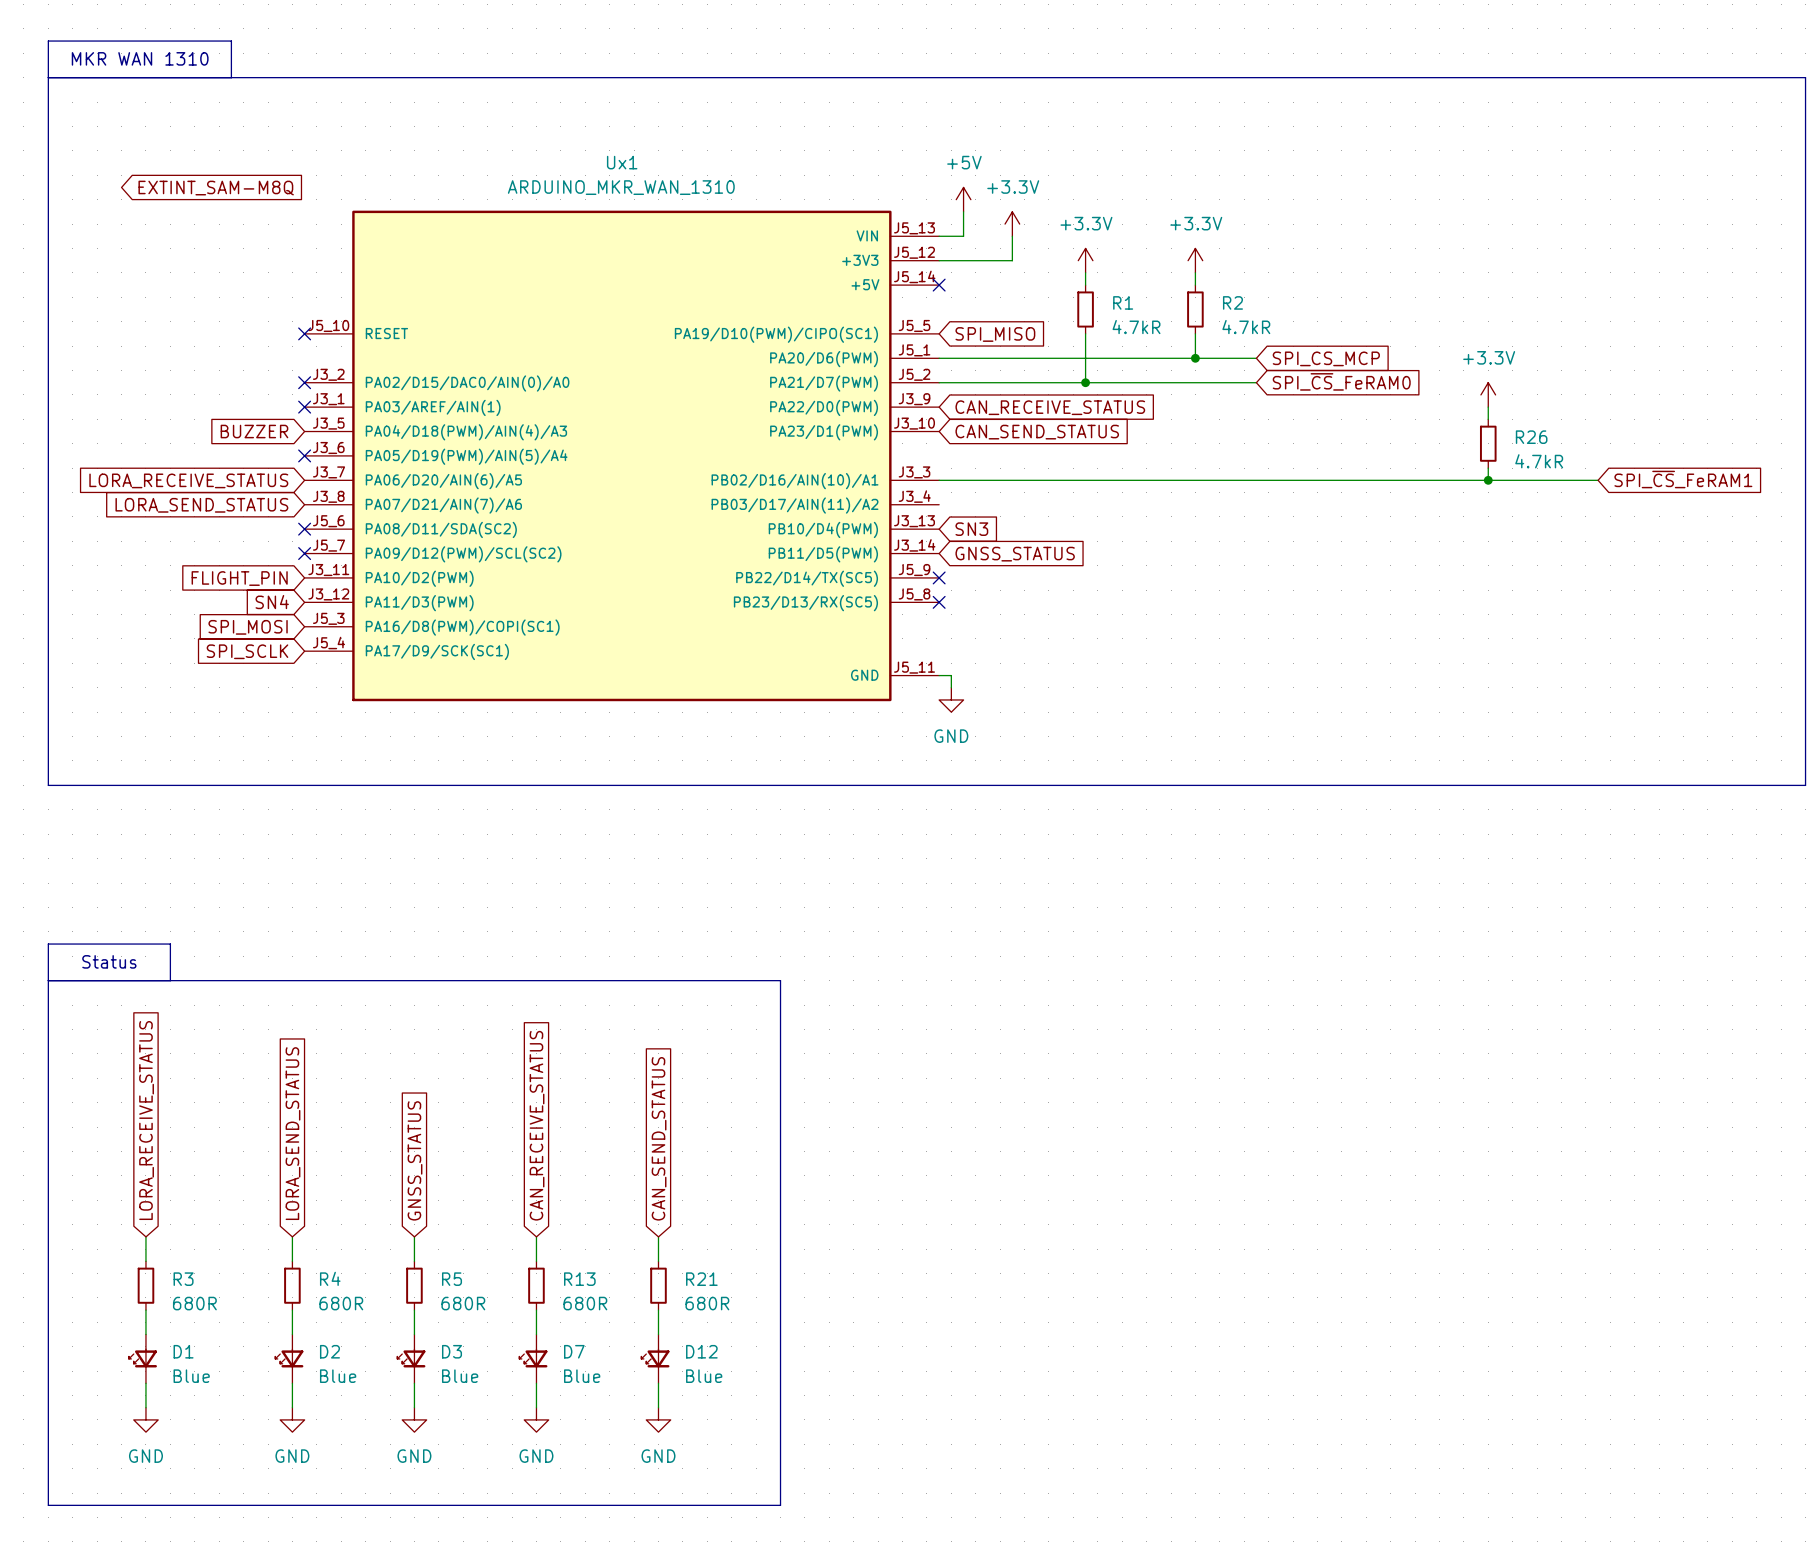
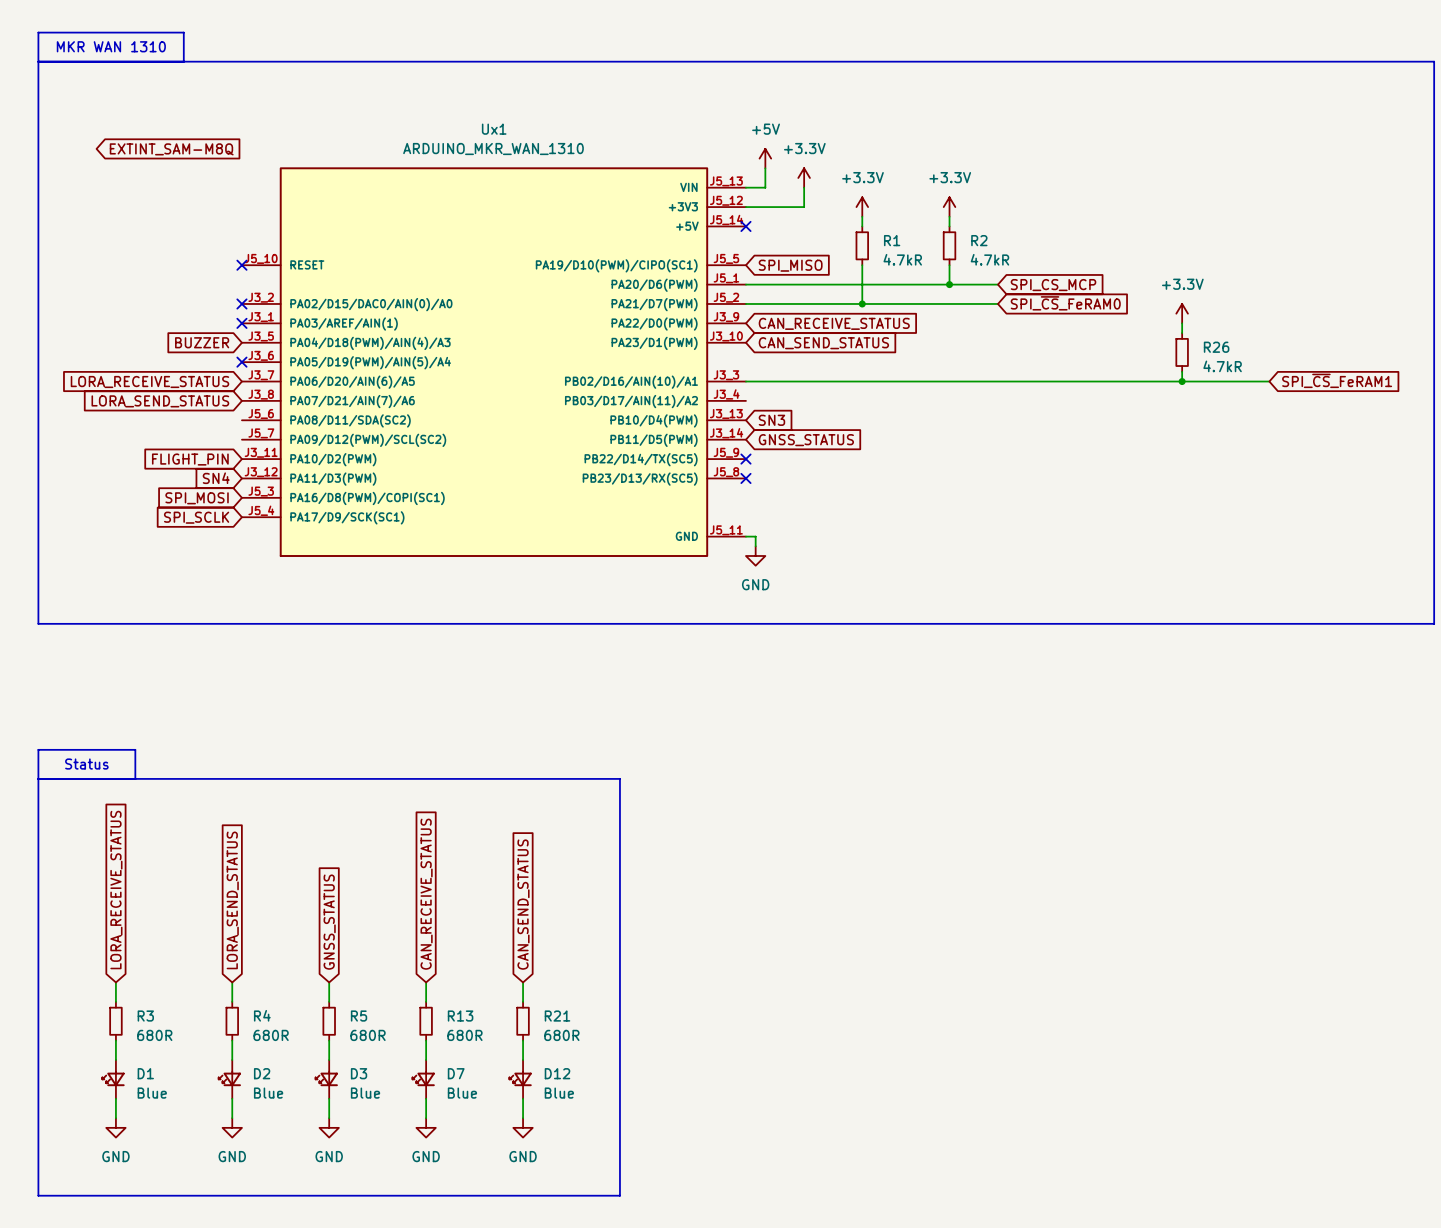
no-connect mark: (304, 529) -> none
no-connect mark: (304, 553) -> none

